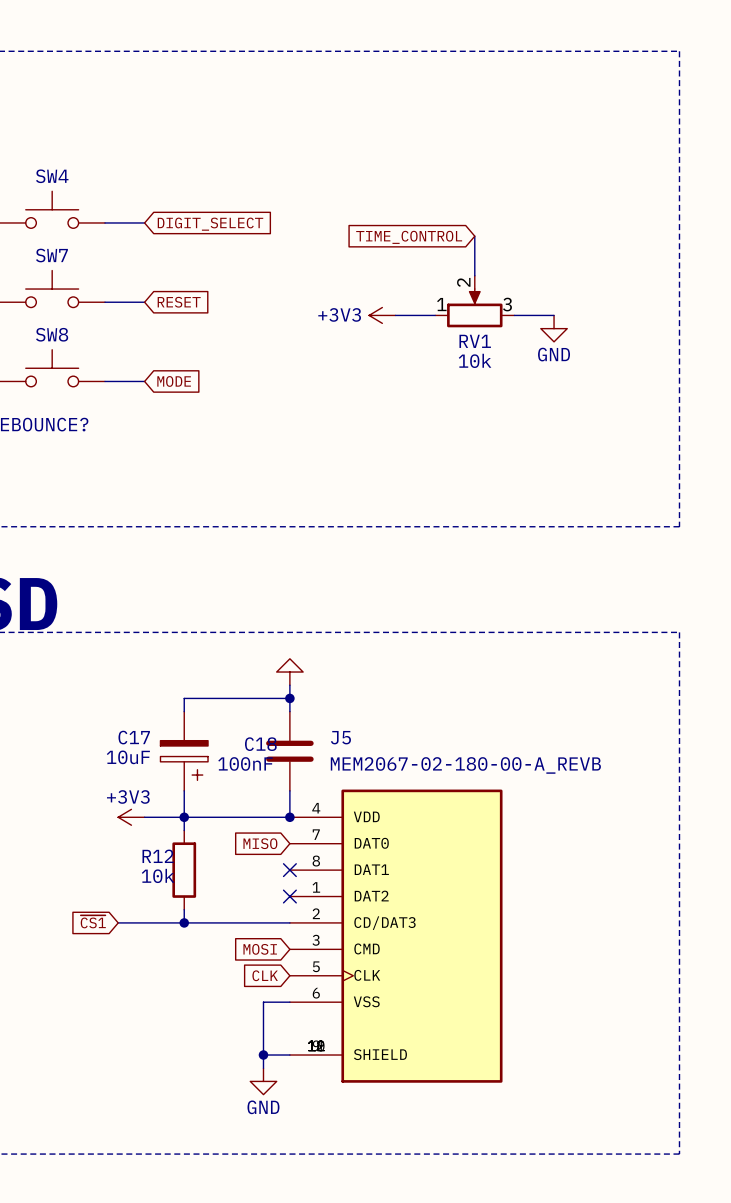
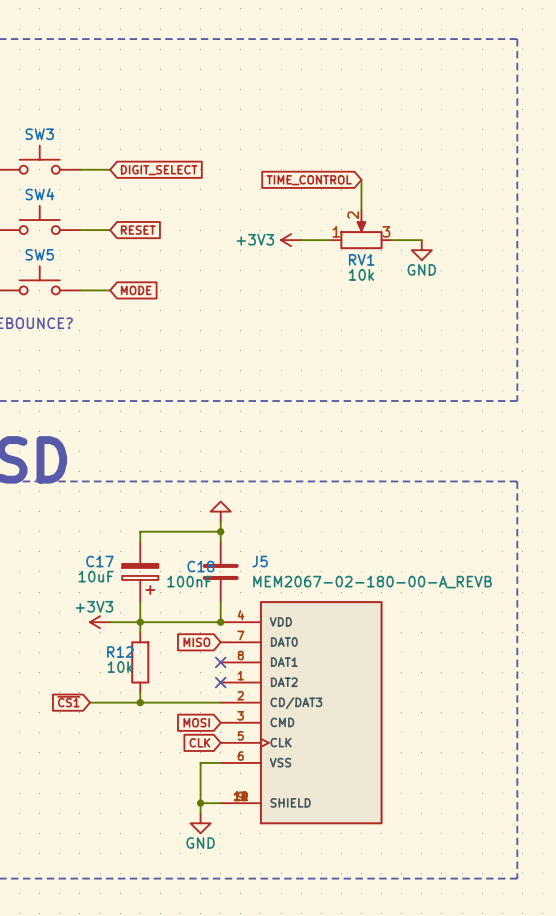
SW4 name: SW4 (52, 176) -> SW3 (39, 134)
SW7 name: SW7 (51, 255) -> SW4 (39, 194)
SW8 name: SW8 (52, 334) -> SW5 (39, 254)

